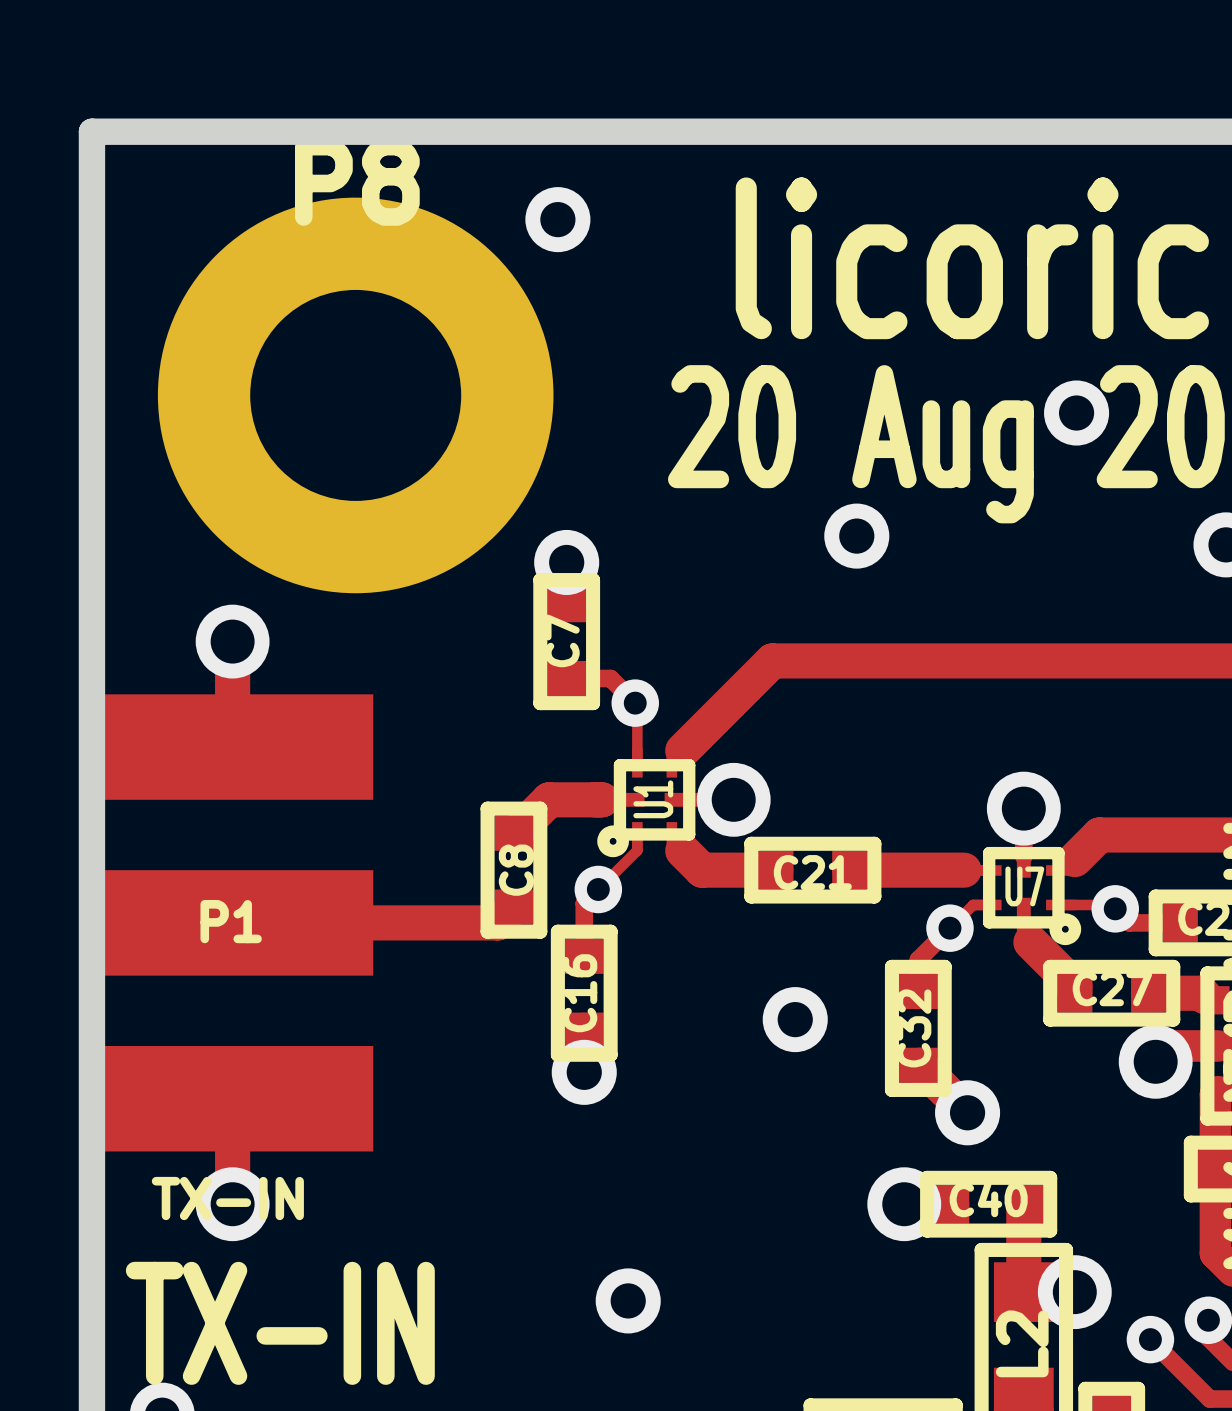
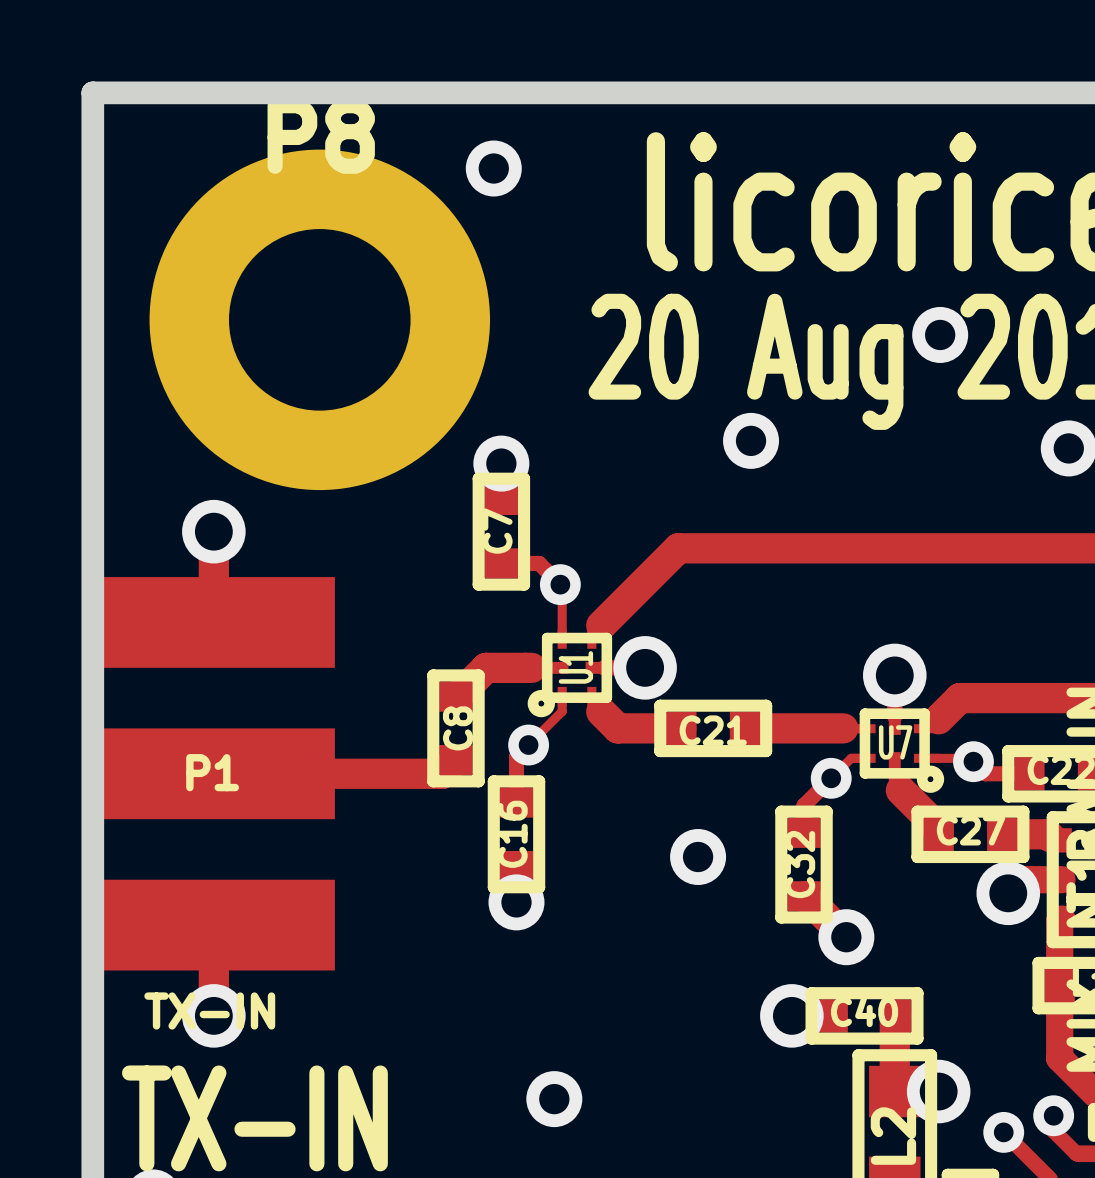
U1 footprint: [597, 747, 707, 858] -> [527, 629, 616, 718]

